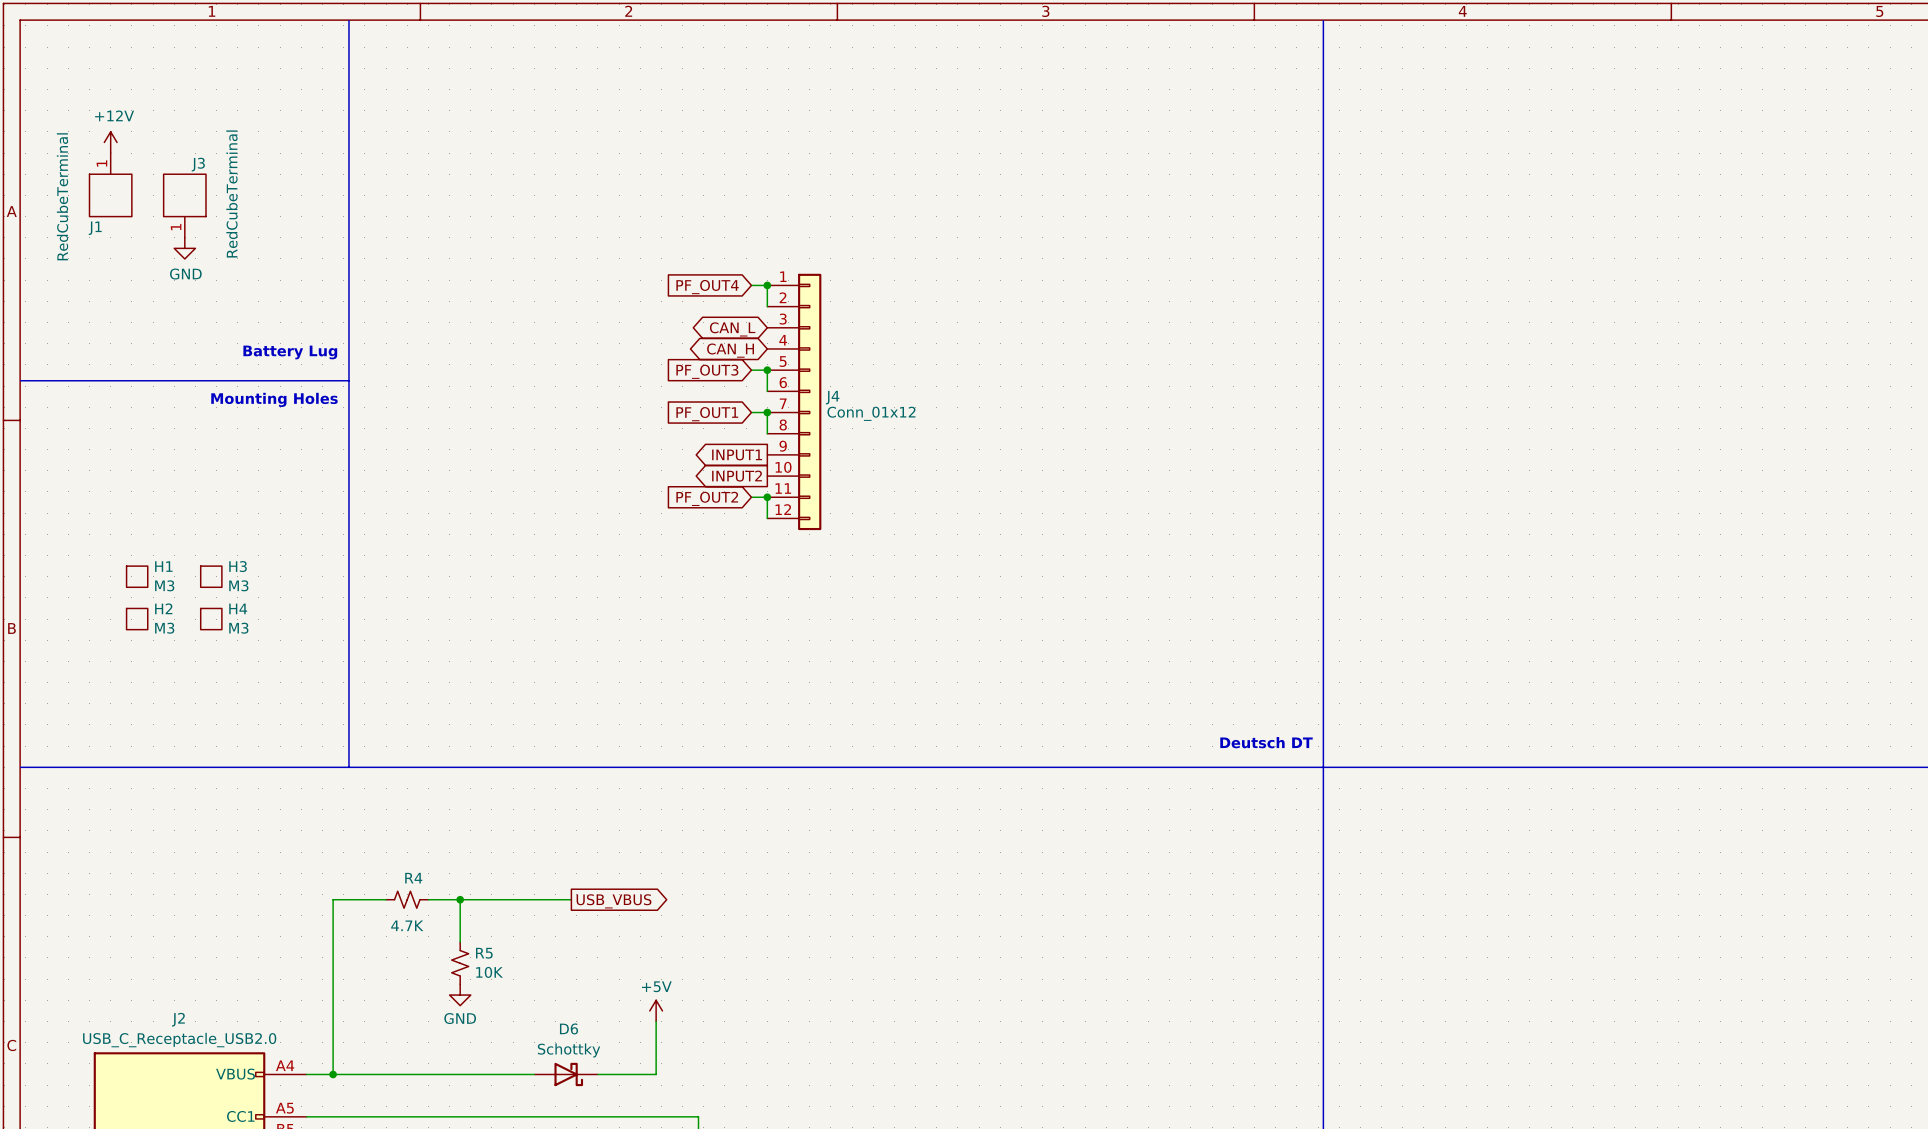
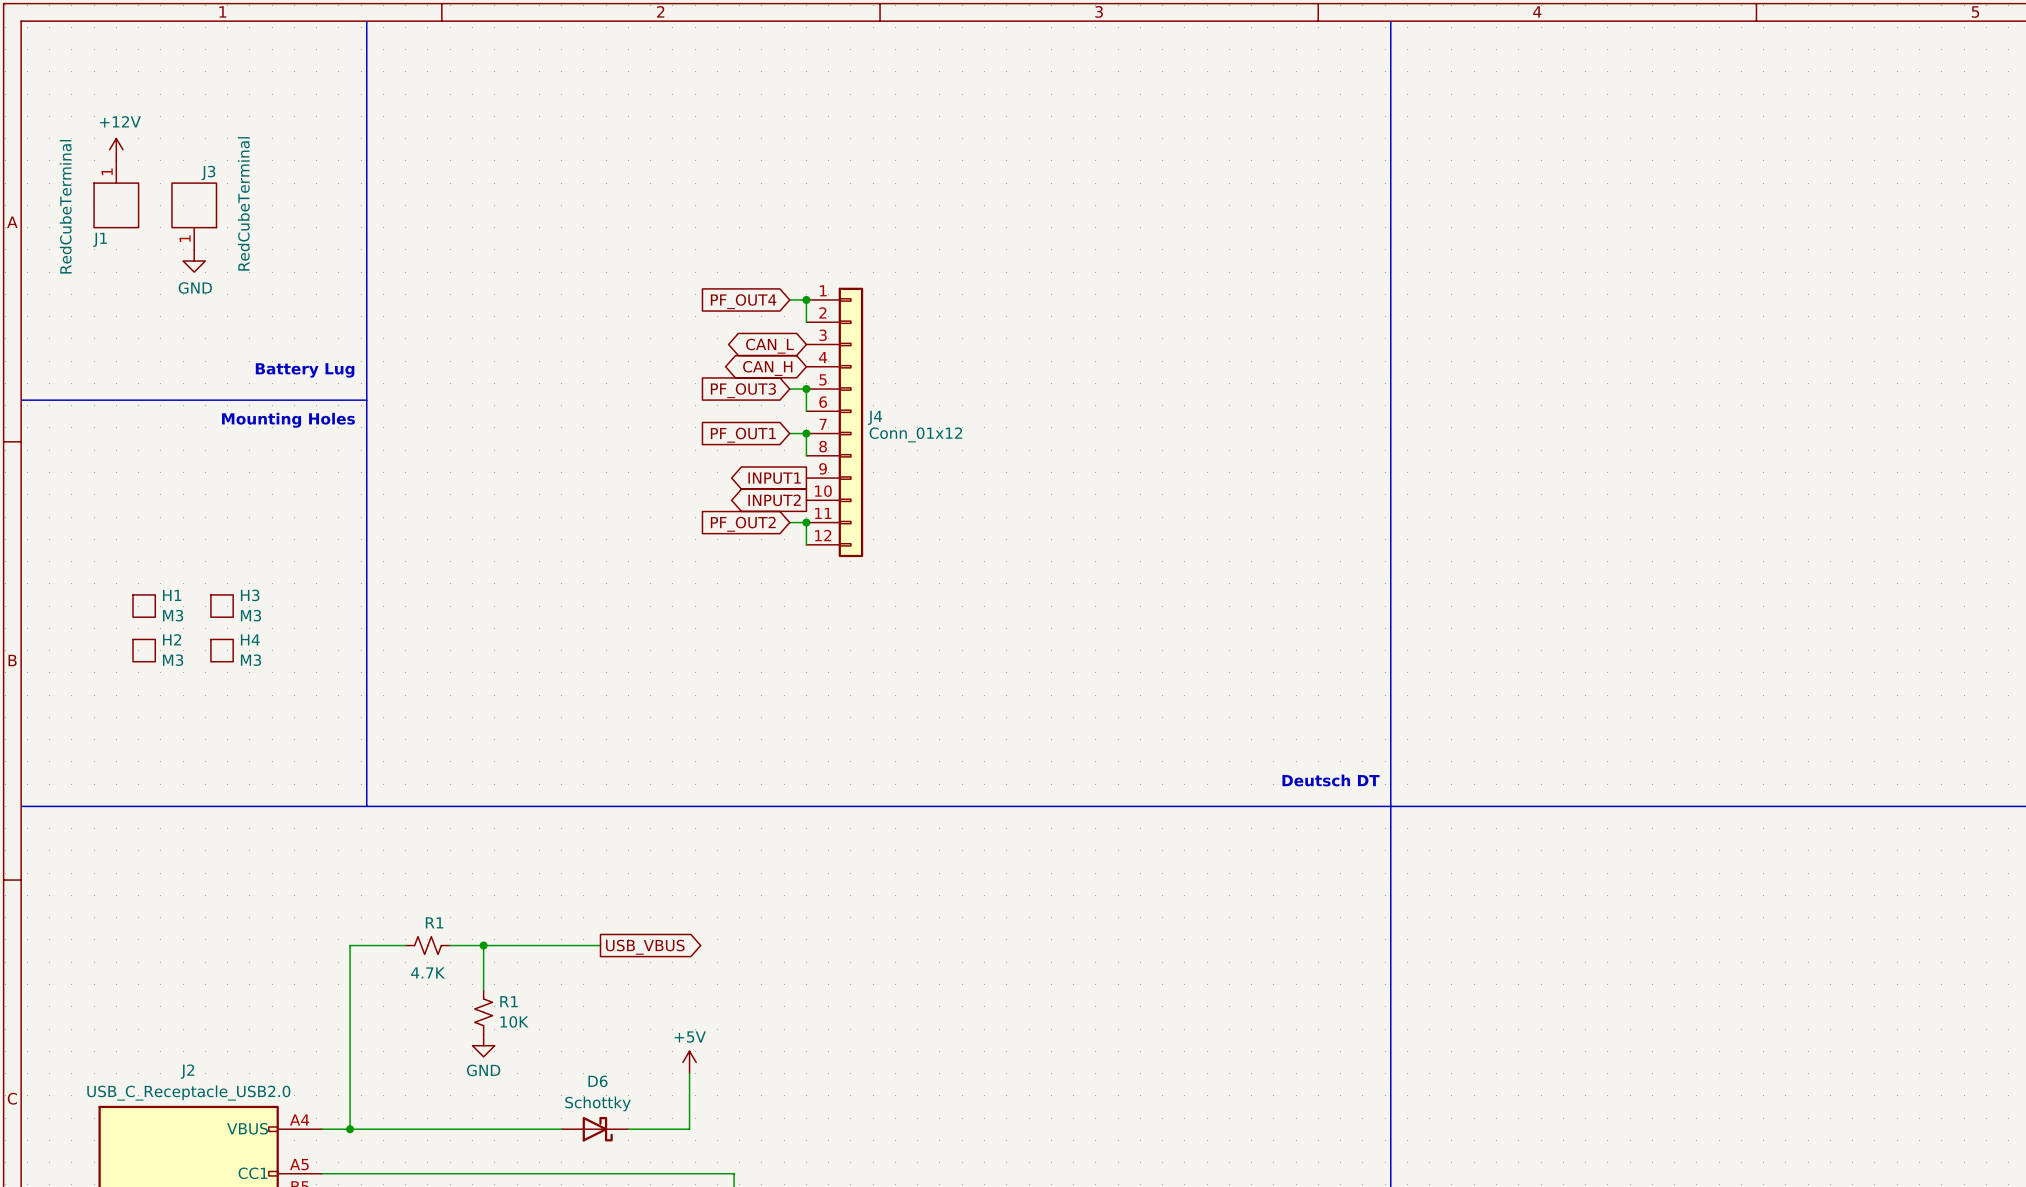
R4 name: R4 (413, 878) -> R1 (434, 922)
R5 name: R5 (484, 953) -> R1 (508, 1001)

